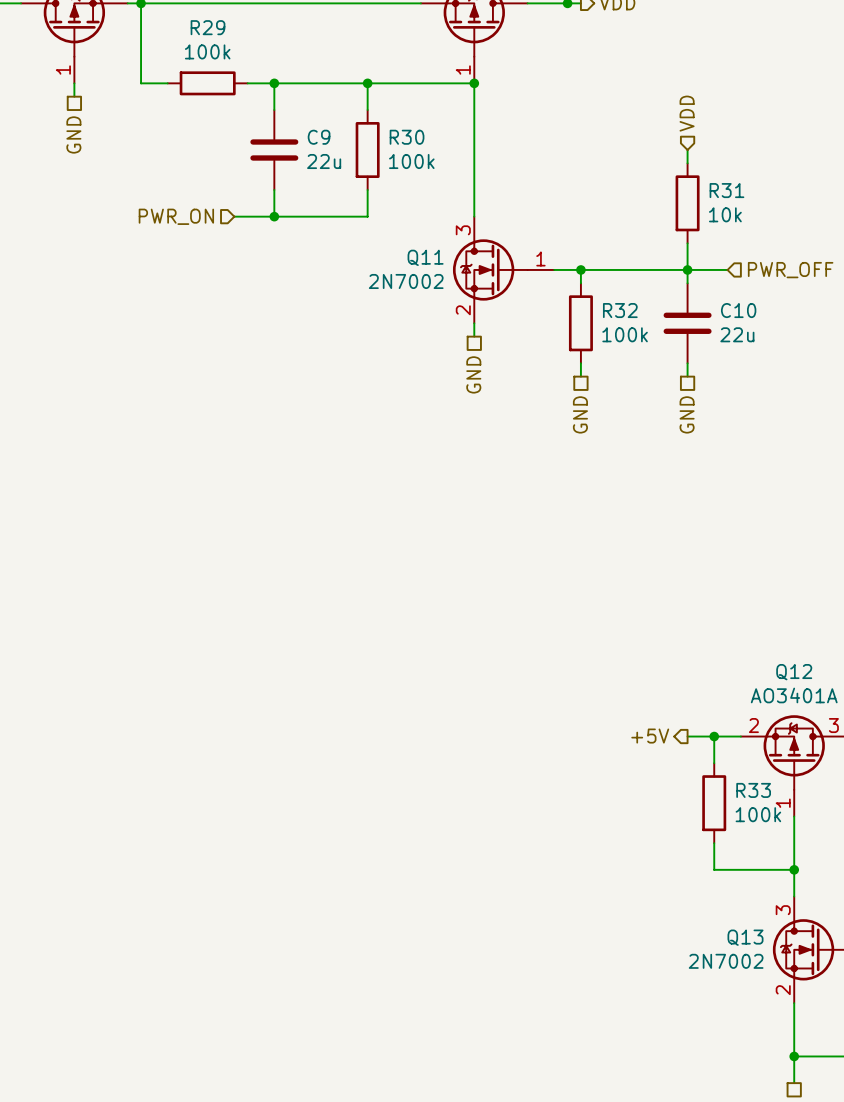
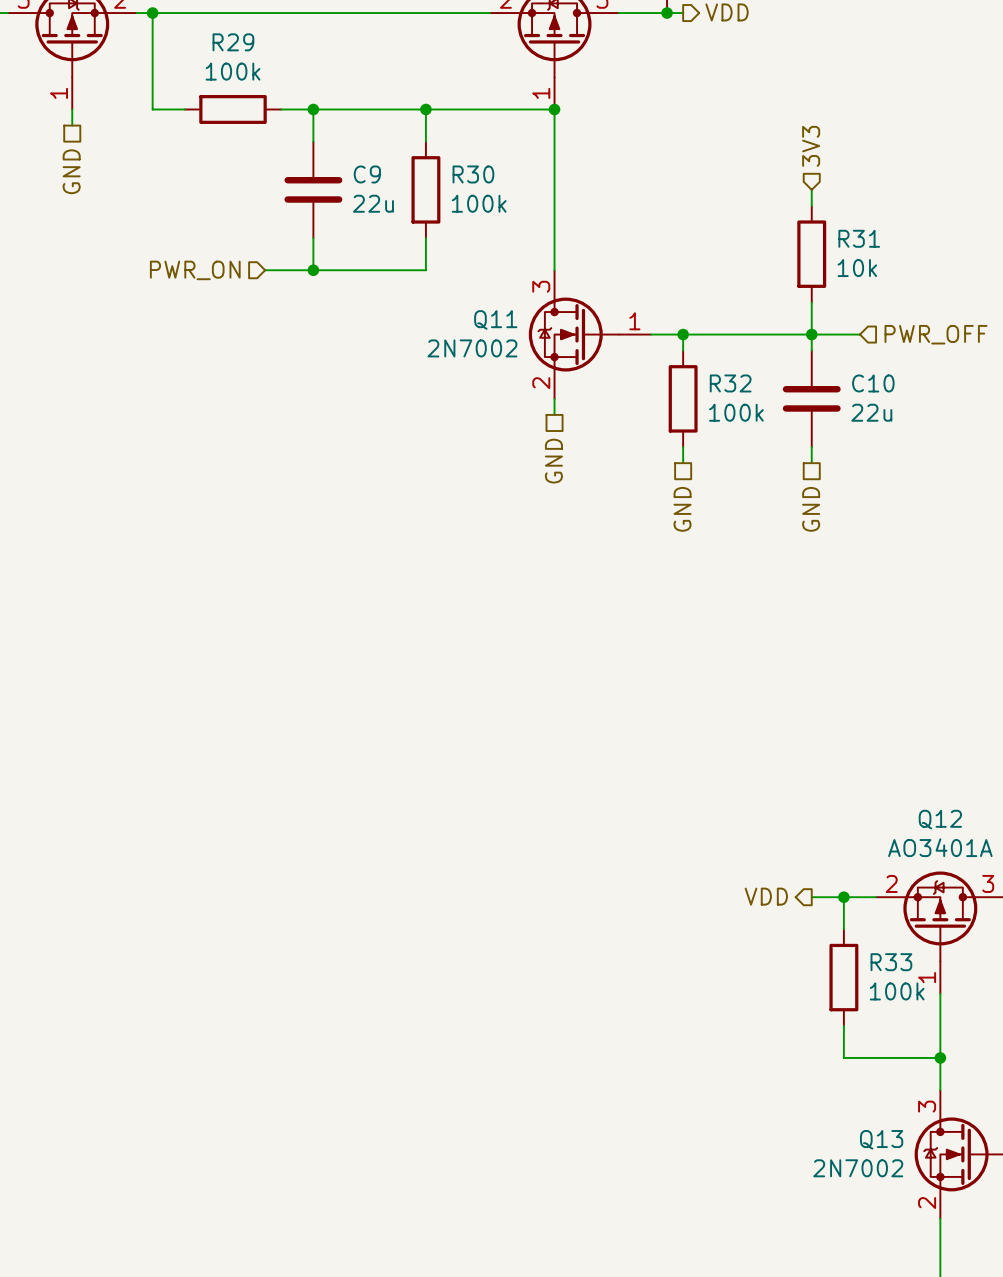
hierarchical label: VDD (687, 113) -> 3V3 (811, 146)
hierarchical label: +5V (650, 736) -> VDD (766, 896)

